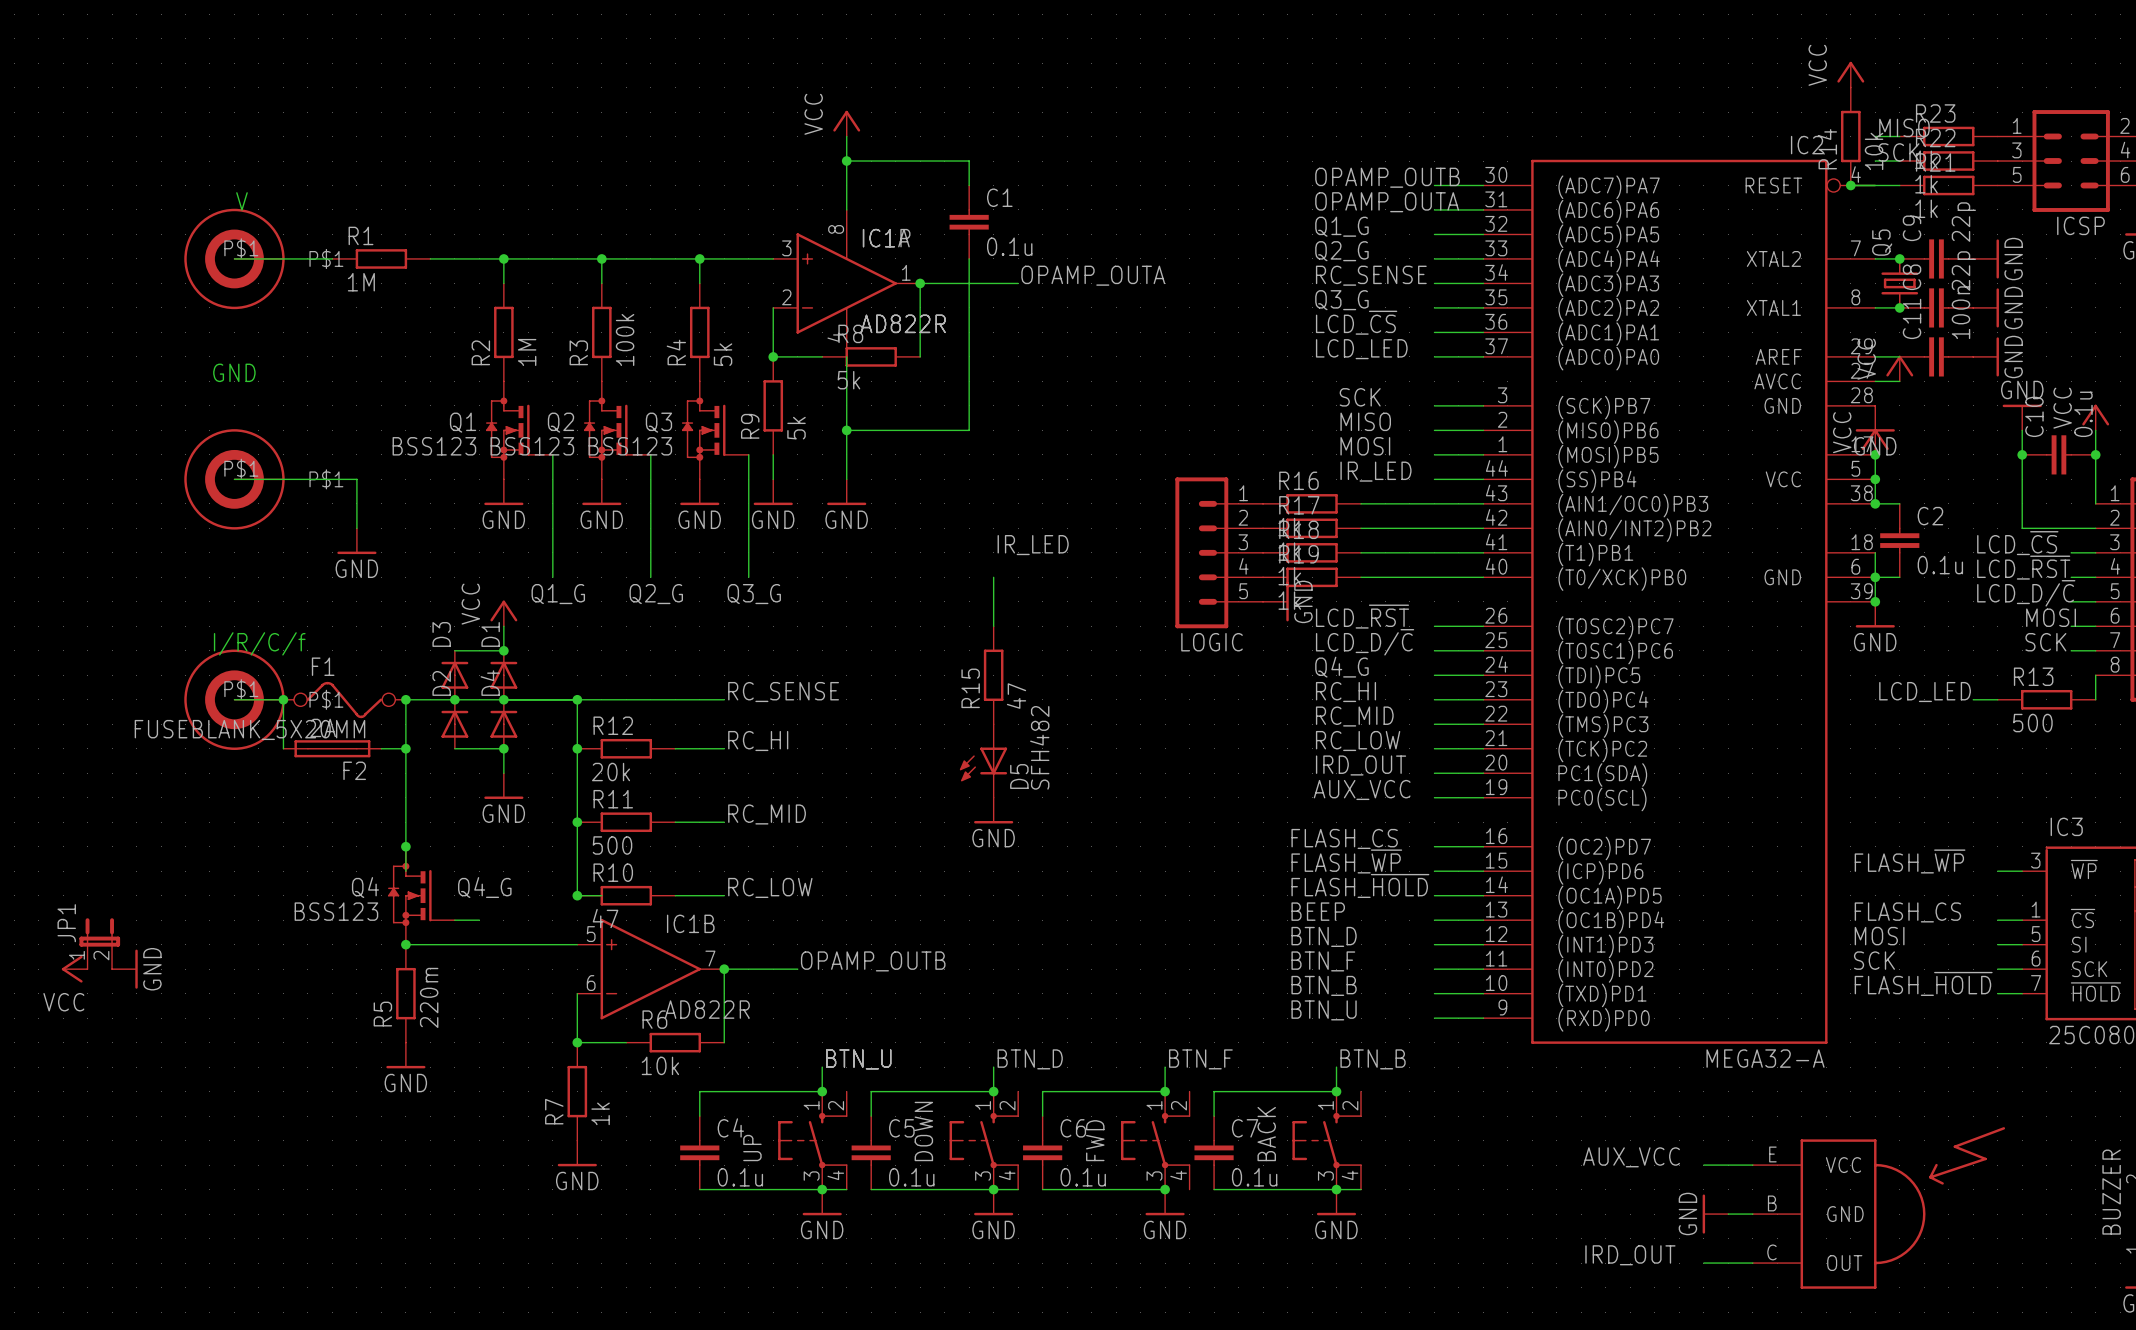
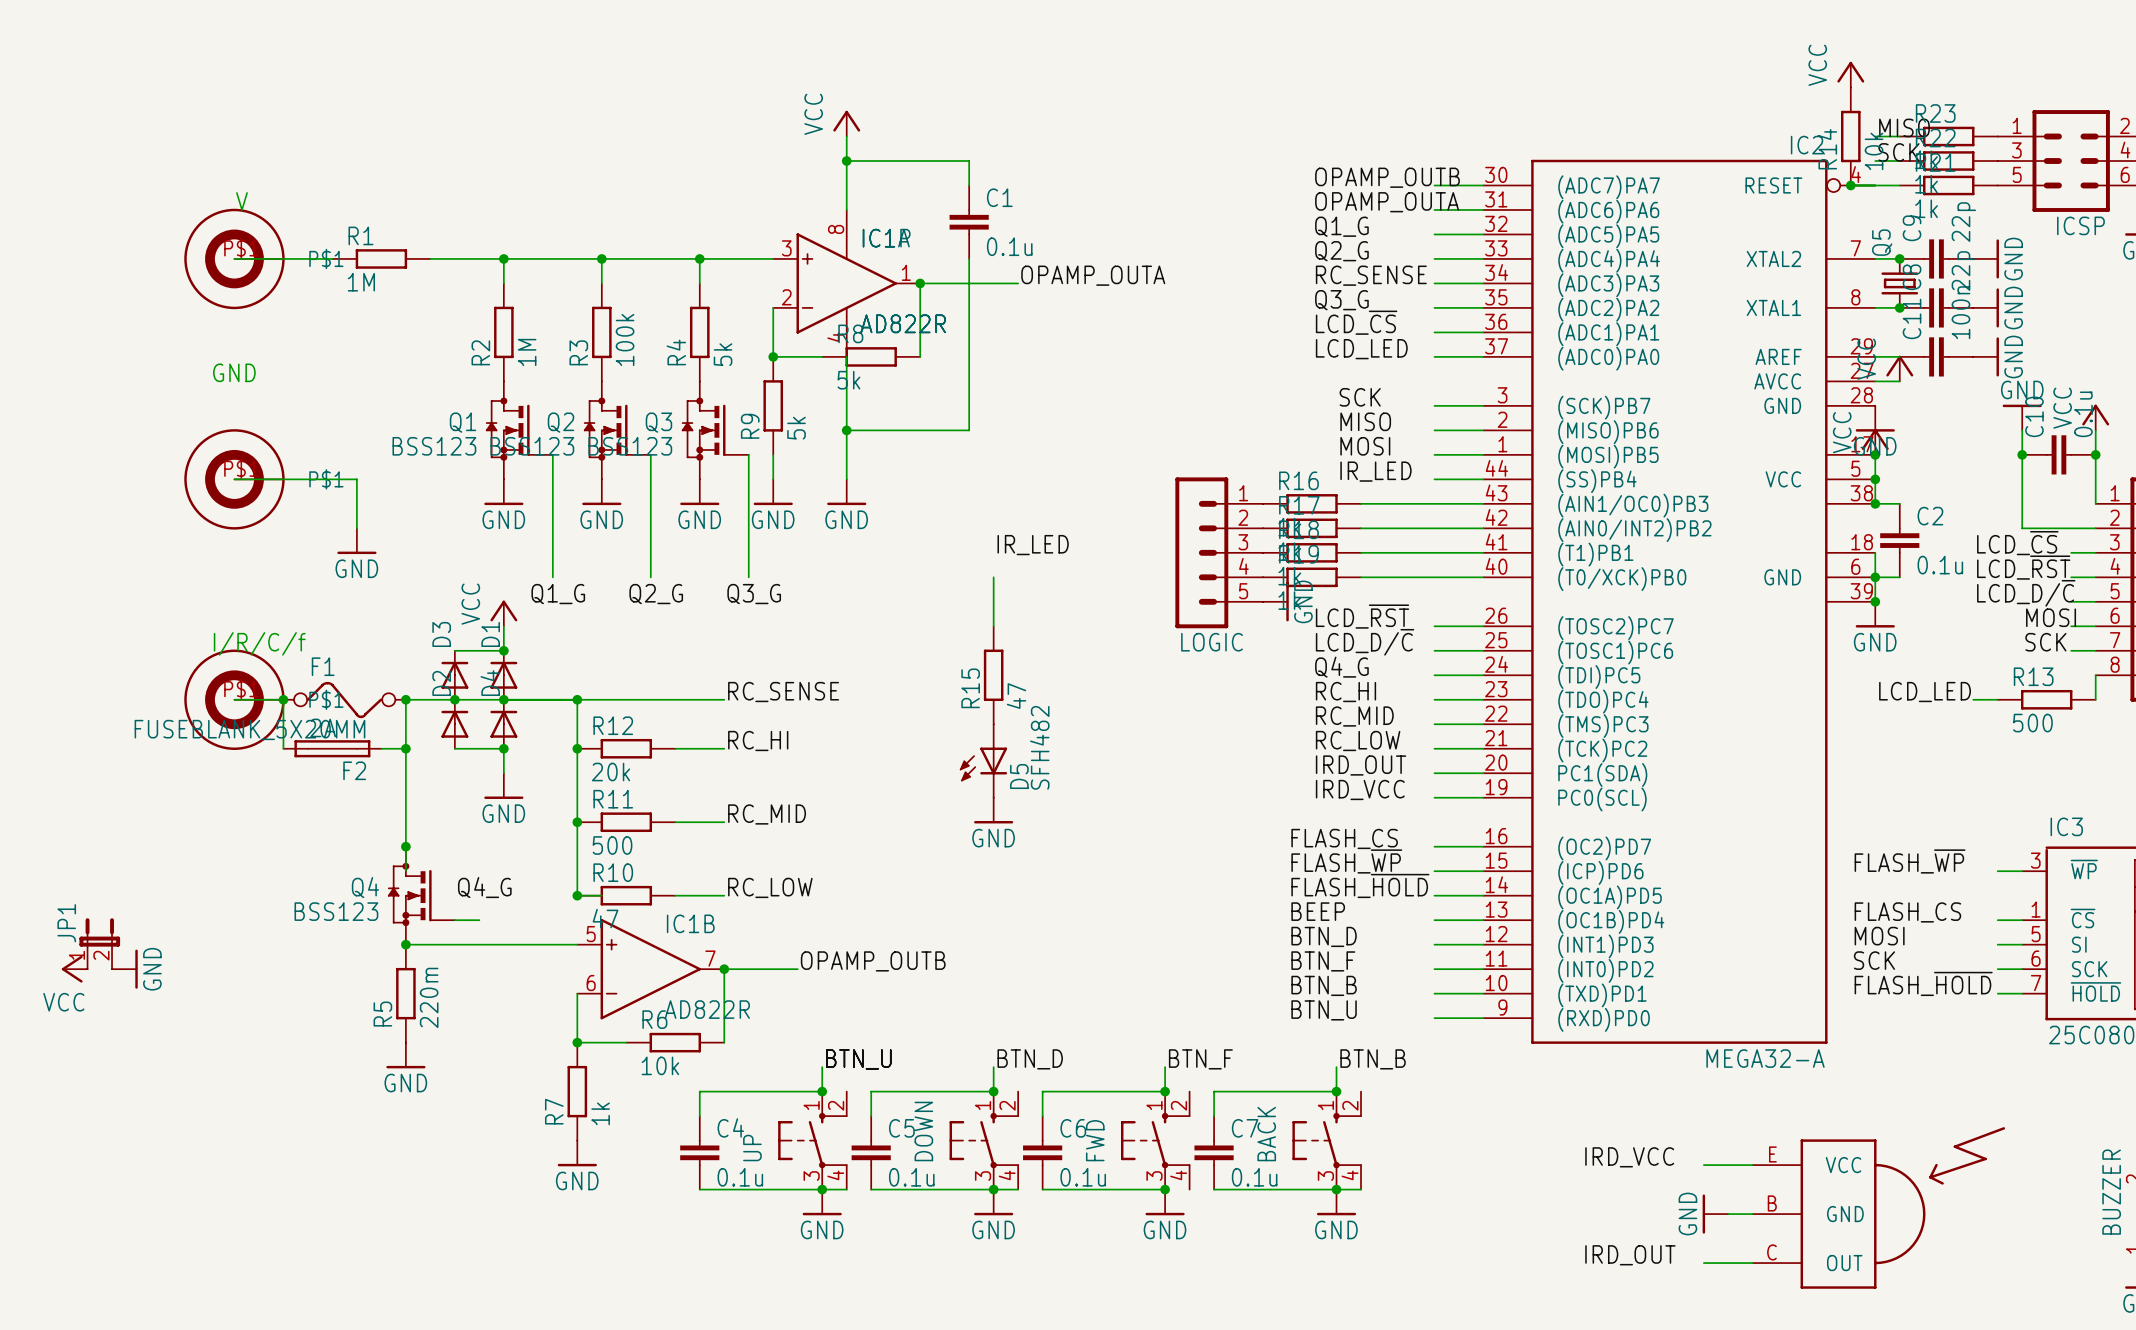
label: AUX_VCC (1362, 789) -> IRD_VCC (1360, 789)
label: AUX_VCC (1631, 1157) -> IRD_VCC (1629, 1157)

